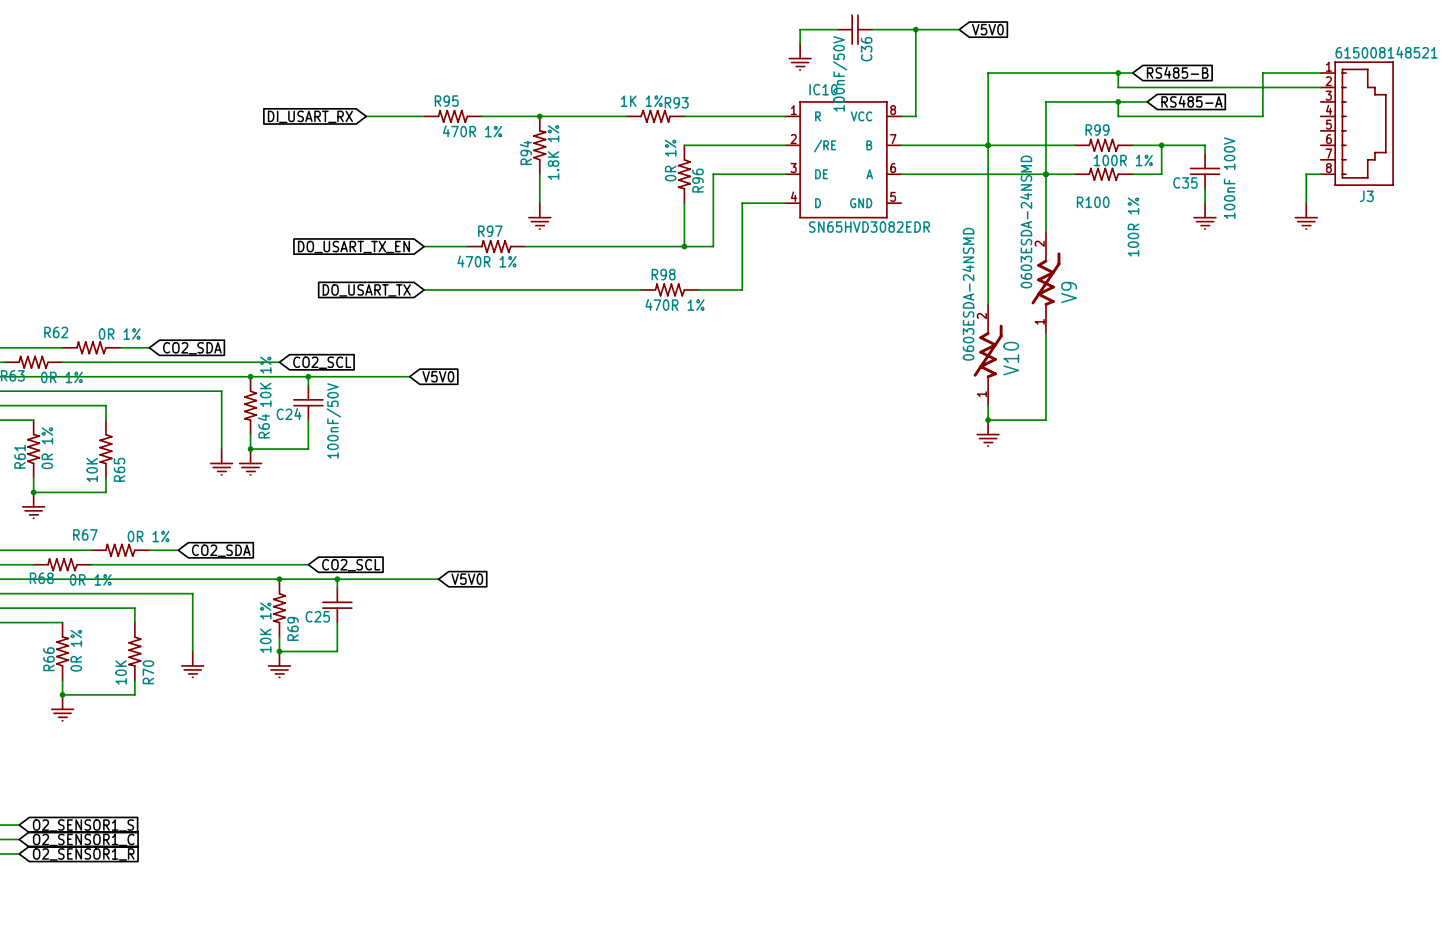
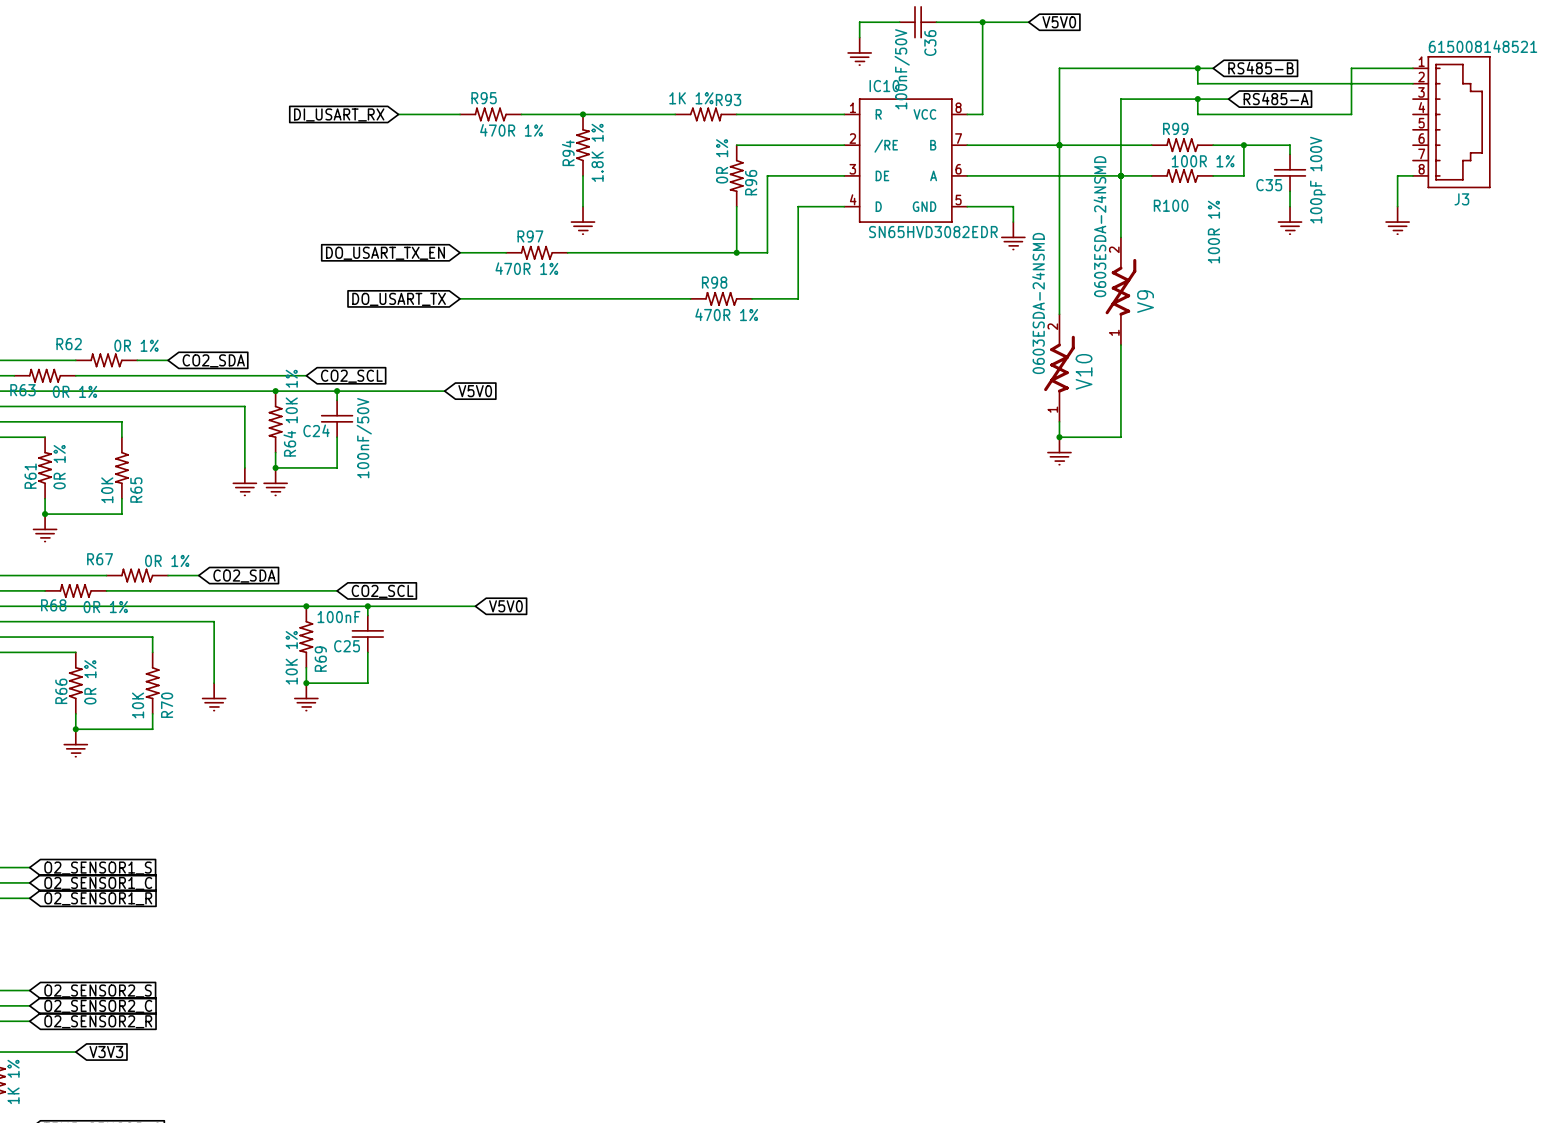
C35 value: 100nF 100V (1229, 178) -> 100pF 100V (1317, 180)
wire: none -> (967, 206) (1013, 206) (1013, 222)
power symbol: none -> (1013, 236)
C25 value: none -> 100nF (338, 617)

